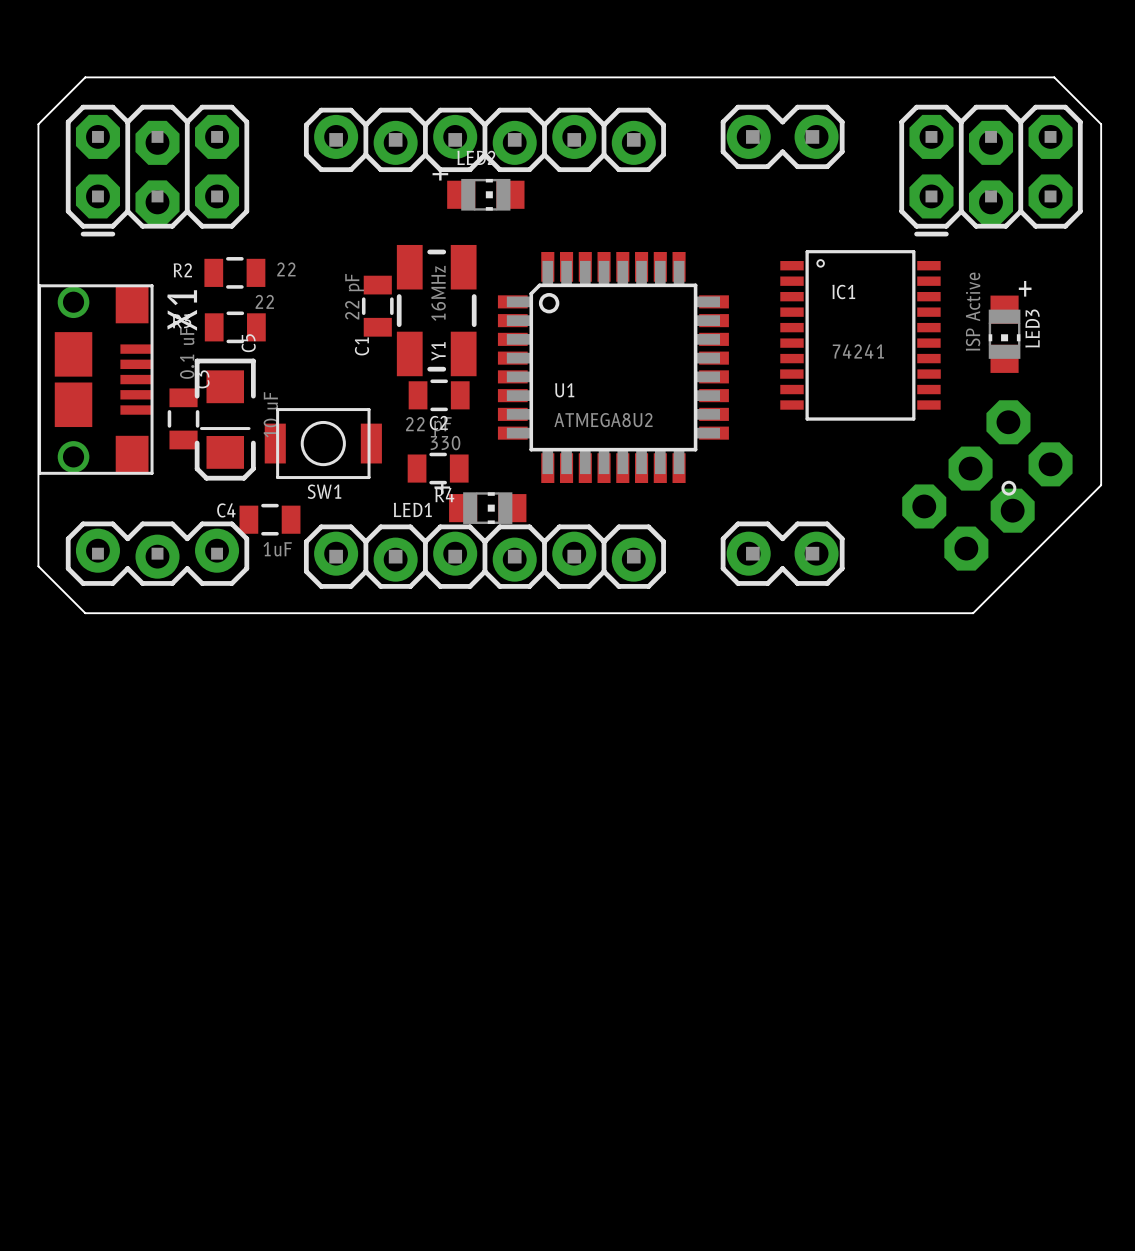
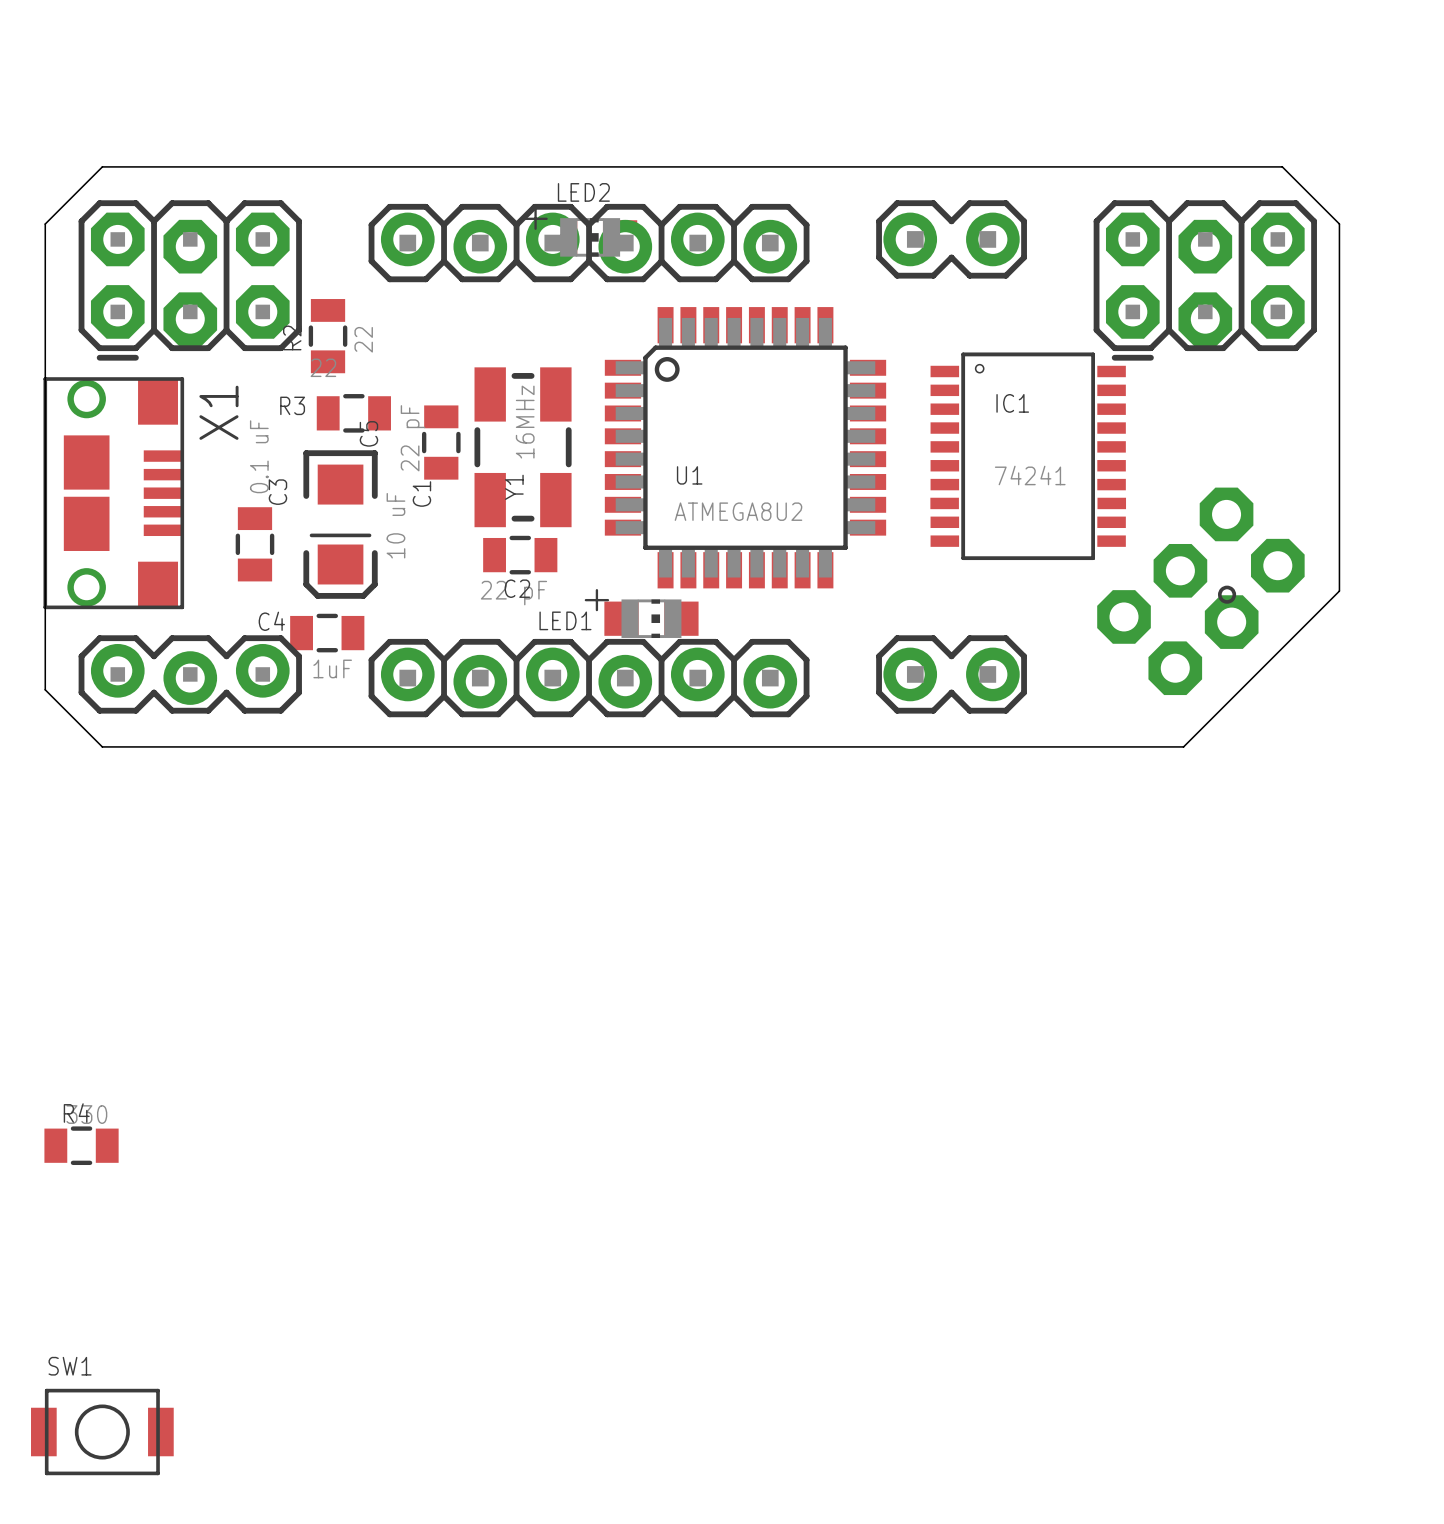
part position: (782, 136) -> (951, 239)
part position: (484, 139) -> (589, 243)
part position: (157, 170) -> (190, 280)
part position: (991, 170) -> (1205, 280)
board edge: (38, 183) (38, 124) (85, 77) (1054, 77) (1101, 124) (1101, 183) -> (45, 224) (102, 166) (1282, 166) (1339, 224)
R2 rotation: 0° (234, 272) -> 90° clockwise (328, 336)
C1 position: (377, 306) -> (441, 442)
Y1 position: (436, 310) -> (523, 447)
R3 position: (235, 327) -> (353, 413)
LED3: ISP Active (1004, 334) -> none
IC1 position: (860, 335) -> (1028, 456)
Y1 name position: Y1 (438, 351) -> Y1 (514, 487)
X1 position: (95, 379) -> (113, 493)
C2 position: (439, 395) -> (520, 555)
C3 position: (183, 418) -> (254, 544)
C5 position: (225, 419) -> (340, 524)
SW1 position: (323, 443) -> (102, 1432)
R4 position: (438, 468) -> (81, 1145)
SW1 name position: SW1 (324, 491) -> SW1 (70, 1366)
R4 name position: R4 (444, 495) -> R4 (76, 1113)
LED1 position: (487, 508) -> (651, 618)

